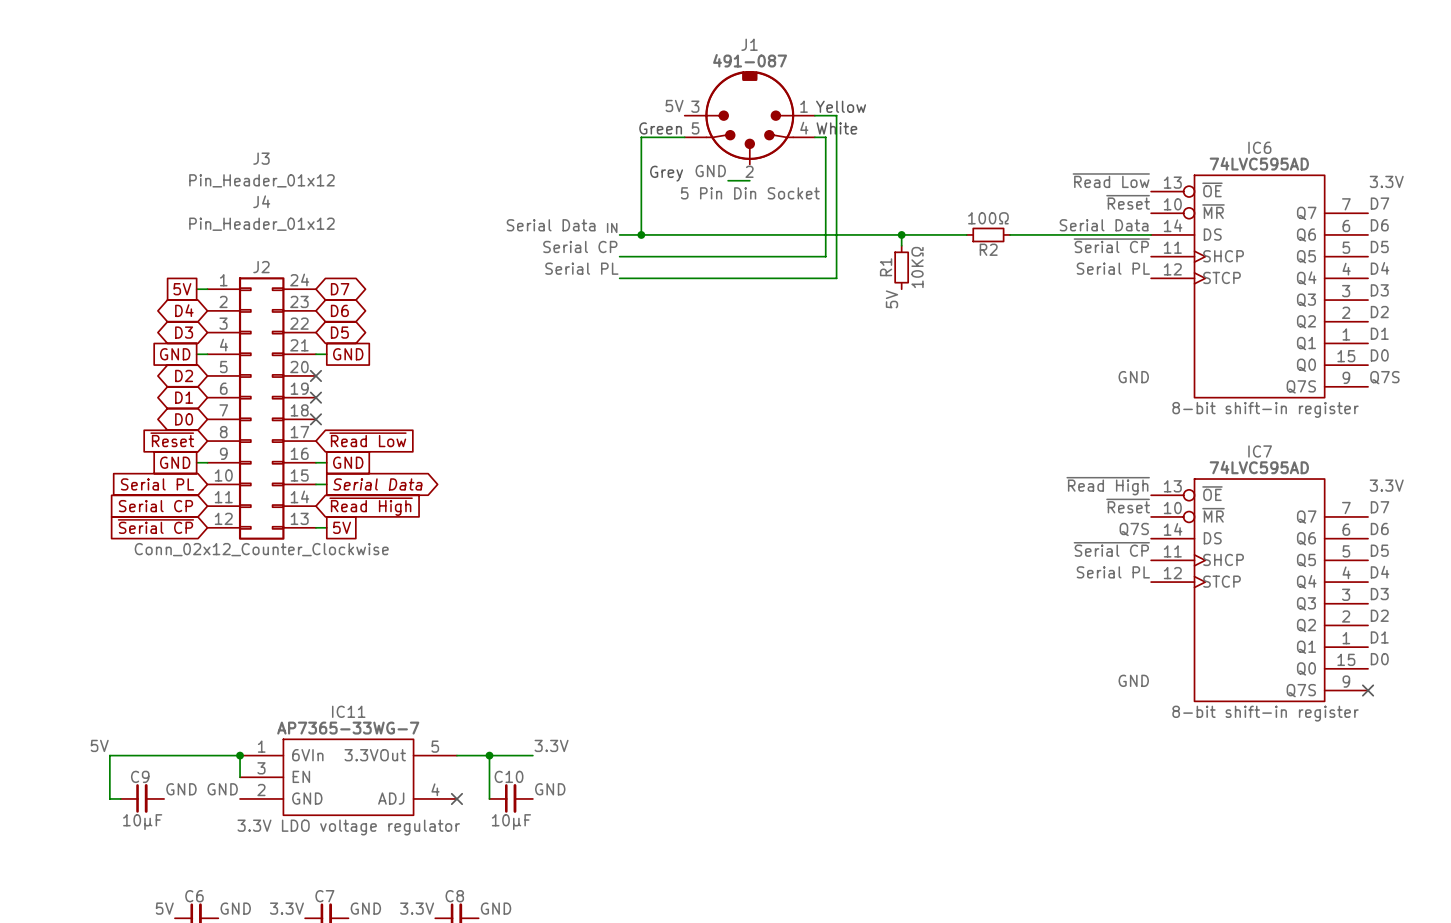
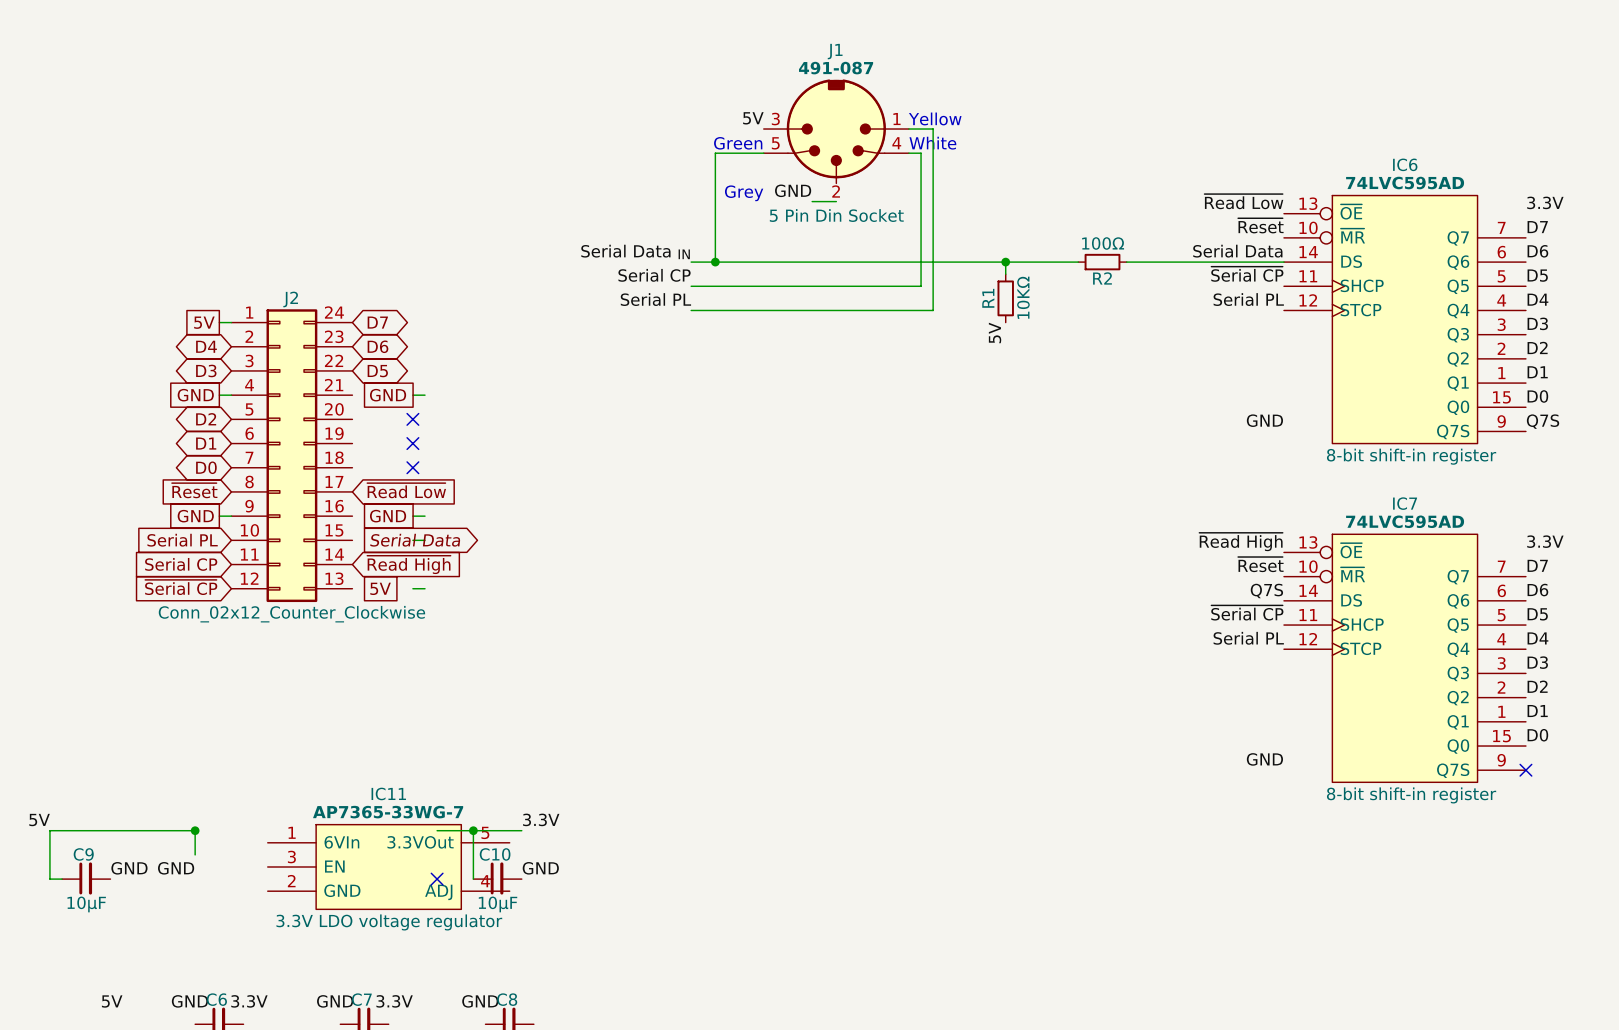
J3: Pin_Header_01x12 (261, 170) -> none
J4: Pin_Header_01x12 (261, 213) -> none
wire: (315, 354) (326, 354) -> (412, 395) (425, 395)
no-connect mark: (315, 375) -> none
no-connect mark: none -> (412, 419)
no-connect mark: (315, 397) -> none
no-connect mark: none -> (412, 443)
no-connect mark: (315, 419) -> none
no-connect mark: none -> (412, 467)
wire: (315, 462) (326, 462) -> (412, 516) (425, 516)
wire: (315, 484) (326, 484) -> (412, 540) (425, 540)
wire: (315, 527) (326, 527) -> (412, 588) (425, 588)
junction: none -> (195, 830)
junction: none -> (473, 830)
label position: 5V (99, 745) -> 5V (39, 820)
label position: 3.3V (551, 745) -> 3.3V (541, 819)
junction: (240, 755) -> none
wire: (456, 755) (532, 755) -> (437, 830) (521, 830)
wire: (489, 755) (489, 798) -> (473, 830) (473, 879)
junction: (489, 755) -> none
wire: (240, 777) (240, 755) (109, 755) (109, 798) (120, 798) -> (195, 854) (195, 830) (49, 830) (49, 879) (62, 879)
label: none -> GND (129, 868)
label: none -> GND (540, 868)
no-connect mark: none -> (437, 879)
label position: GND (181, 789) -> GND (176, 868)
label: GND (222, 789) -> none
label: GND (550, 789) -> none
C9 position: (142, 798) -> (86, 878)
no-connect mark: (456, 798) -> none
C10 position: (511, 798) -> (497, 878)
label: none -> GND (189, 1001)
label: none -> 3.3V (249, 1001)
label: none -> GND (335, 1001)
label: none -> 3.3V (394, 1001)
label: none -> GND (480, 1001)
label position: 5V (164, 908) -> 5V (112, 1001)
label: GND (235, 908) -> none
label: 3.3V (286, 908) -> none
label: GND (365, 908) -> none
label: 3.3V (417, 908) -> none
label: GND (496, 908) -> none

